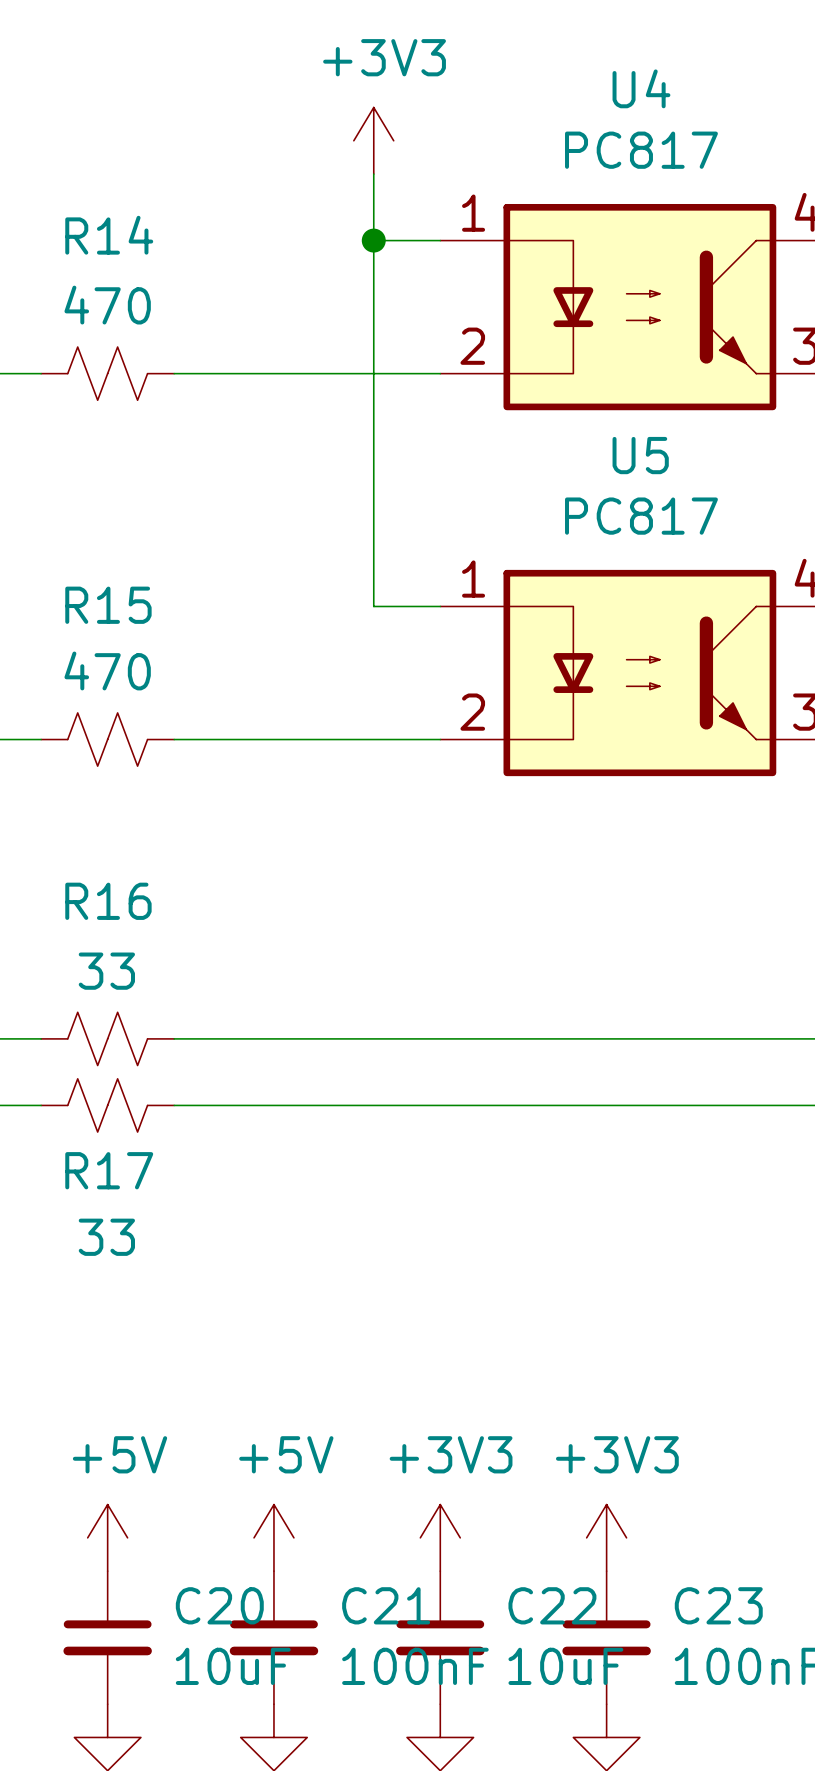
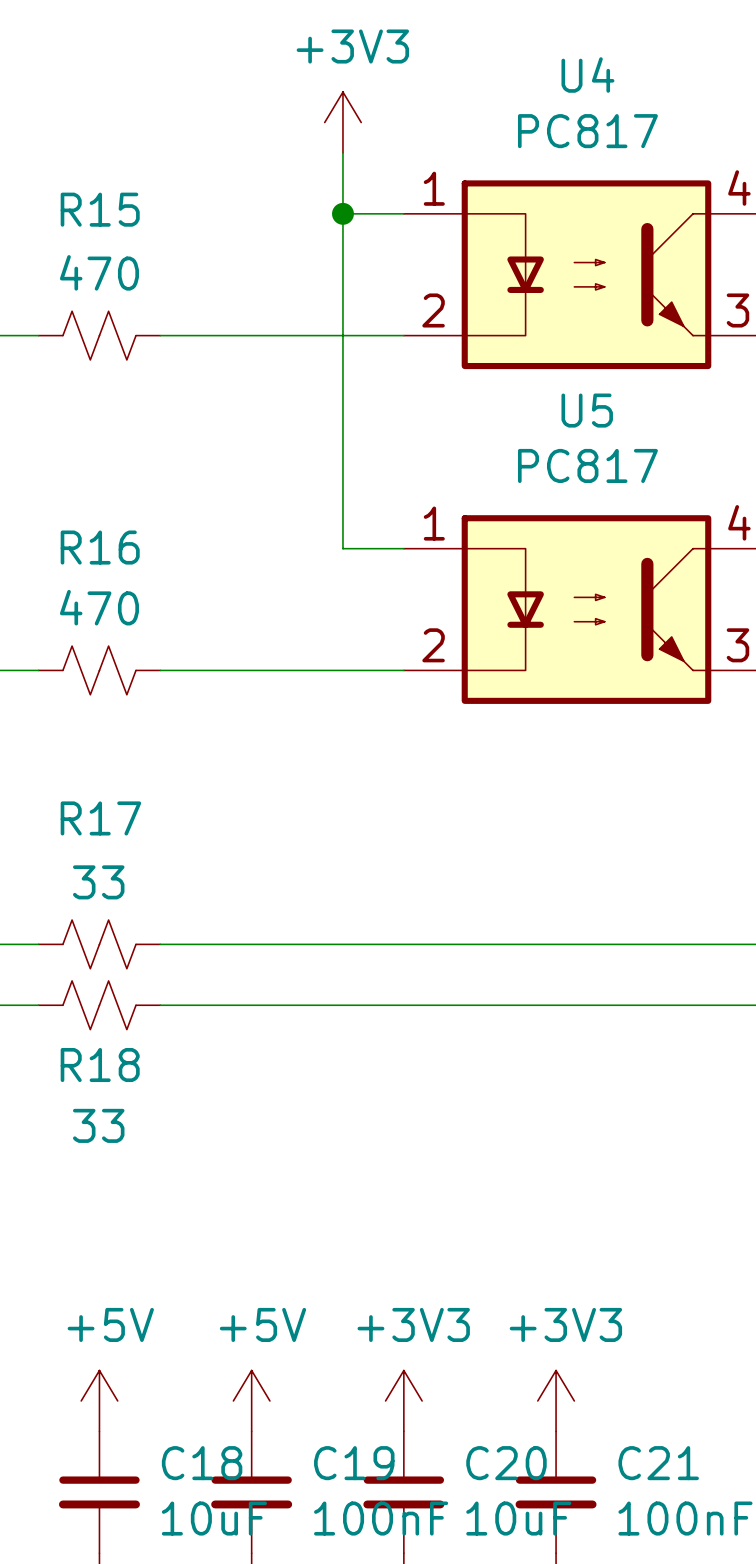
R14 name: R14 (109, 235) -> R15 (100, 209)
R15 name: R15 (108, 605) -> R16 (100, 547)
R16 name: R16 (108, 901) -> R17 (100, 818)
R17 name: R17 (109, 1170) -> R18 (100, 1065)
C20 name: C20 (219, 1605) -> C18 (202, 1463)
C21 name: C21 (386, 1605) -> C19 (354, 1463)
C22 name: C22 (552, 1605) -> C20 (506, 1463)
C23 name: C23 (718, 1605) -> C21 (658, 1463)

